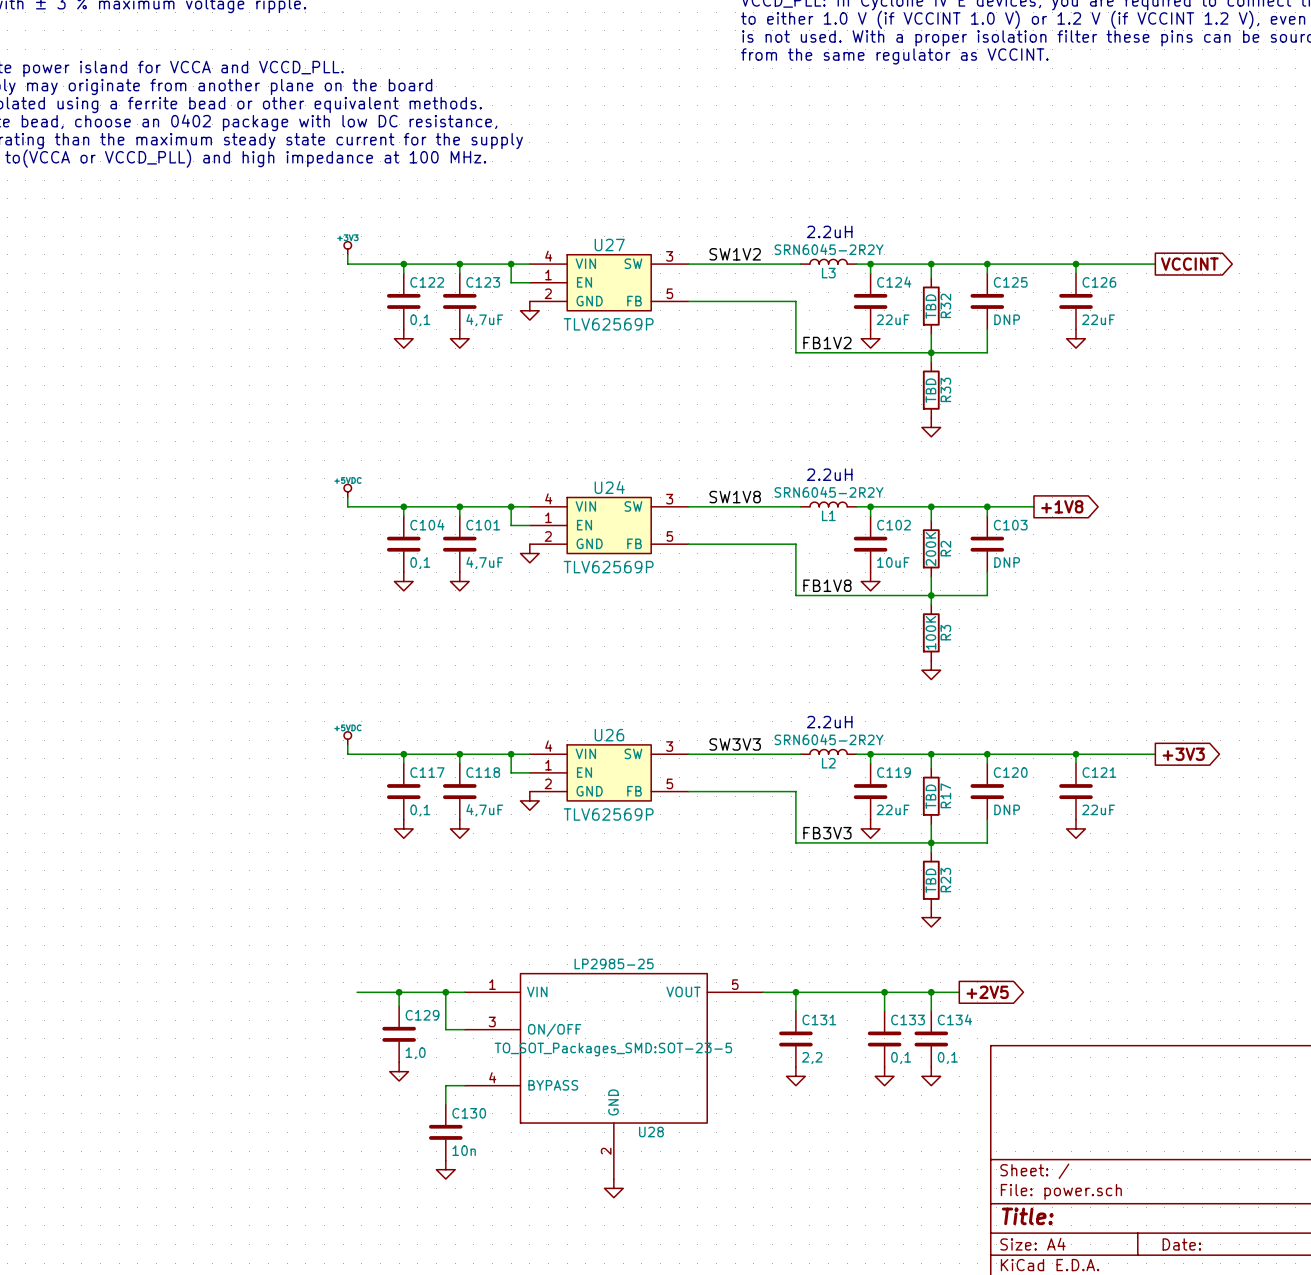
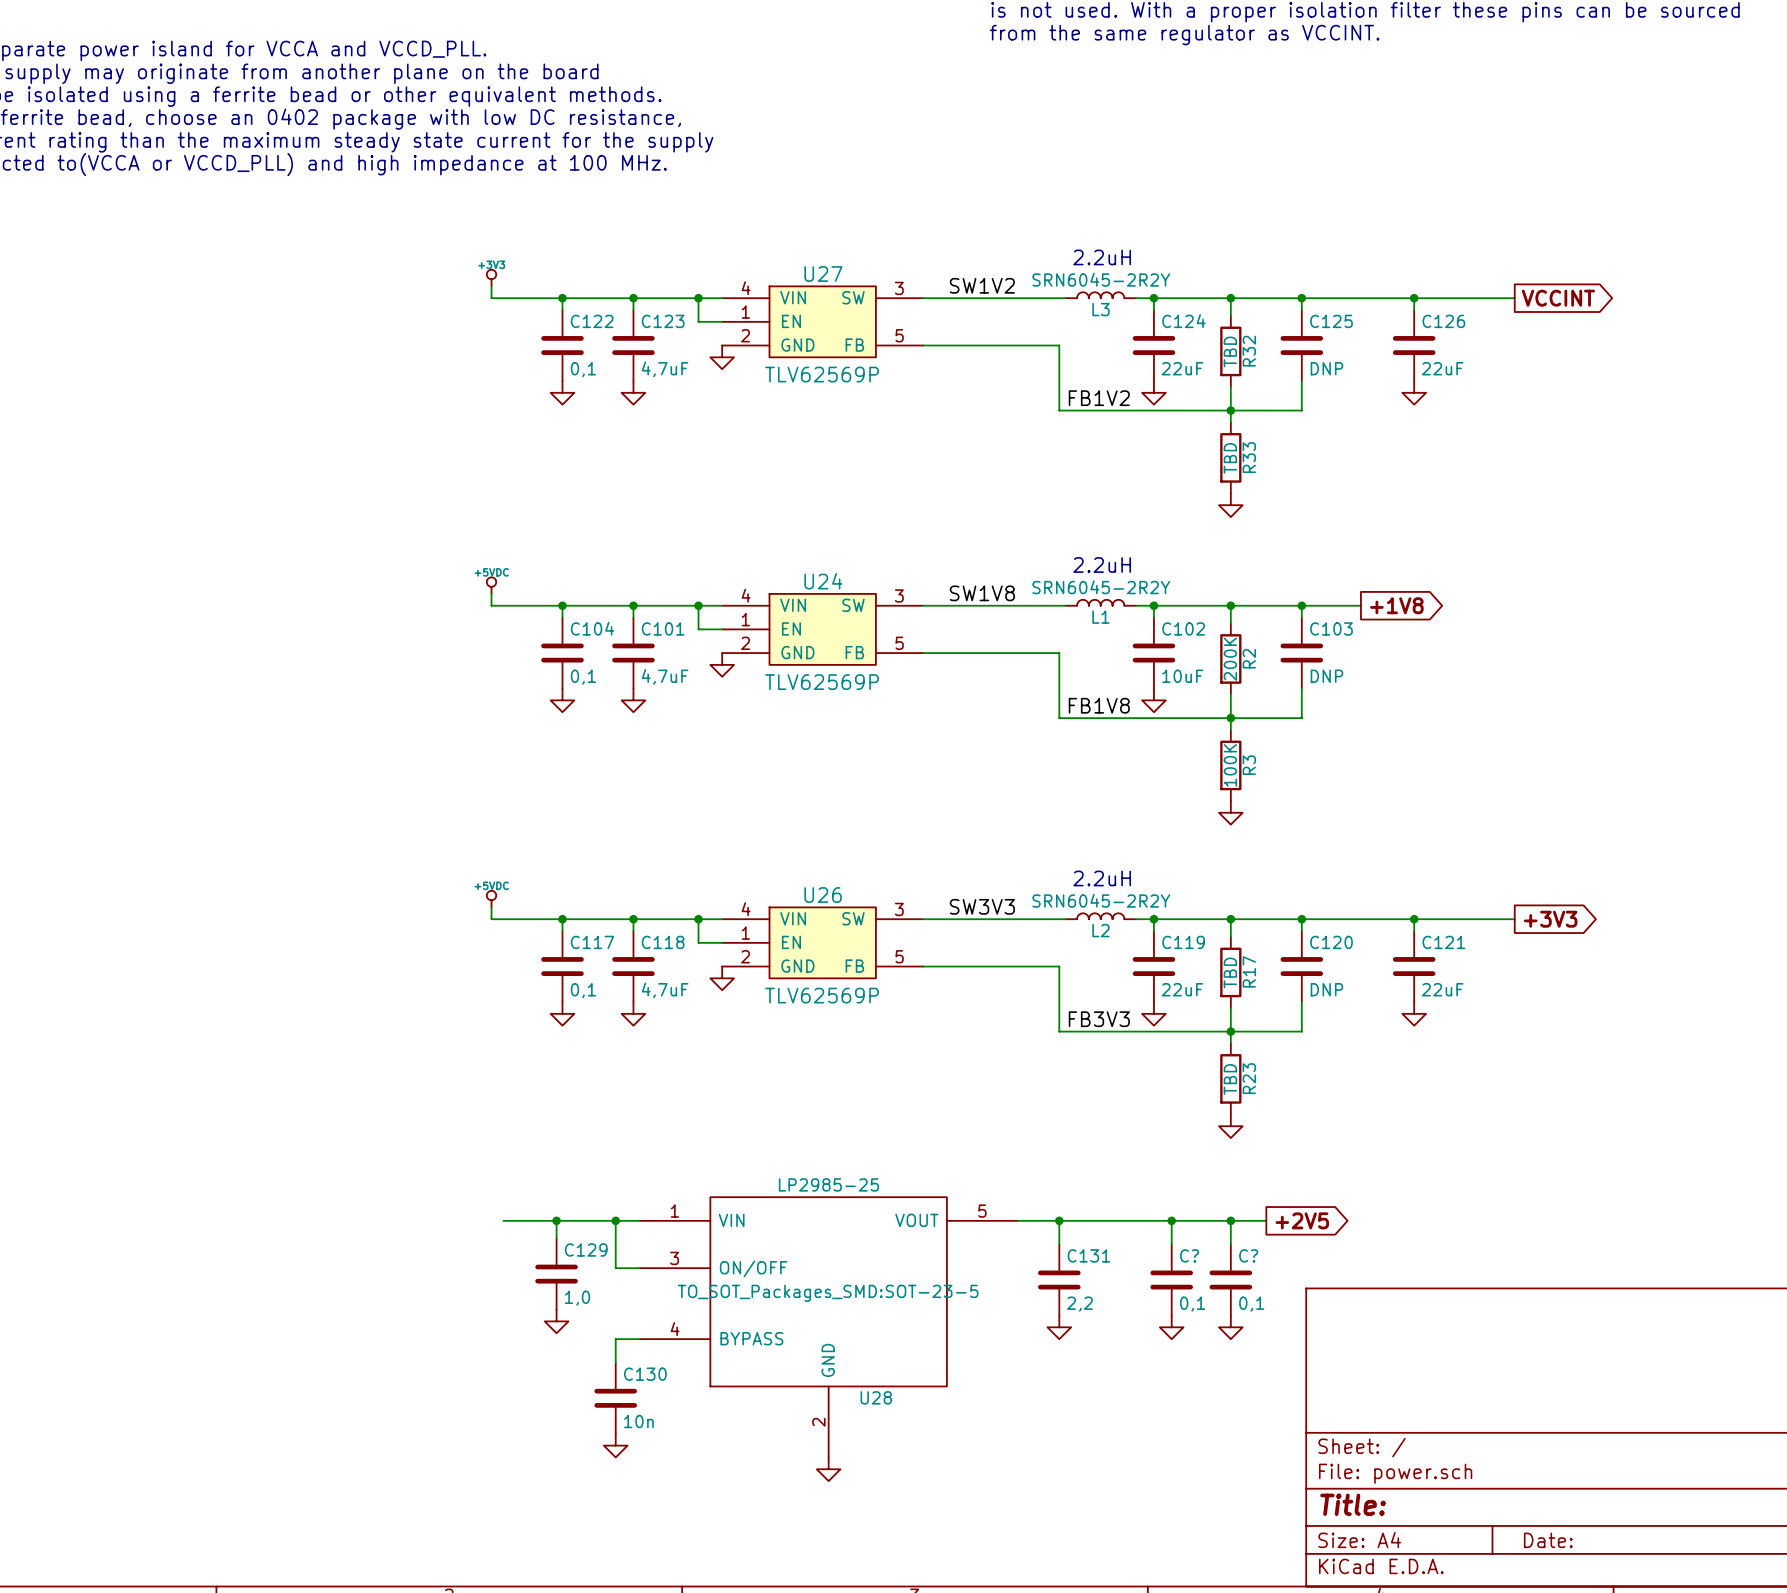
C133 name: C133 (908, 1019) -> C? (1189, 1255)
C134 name: C134 (954, 1019) -> C? (1248, 1255)

